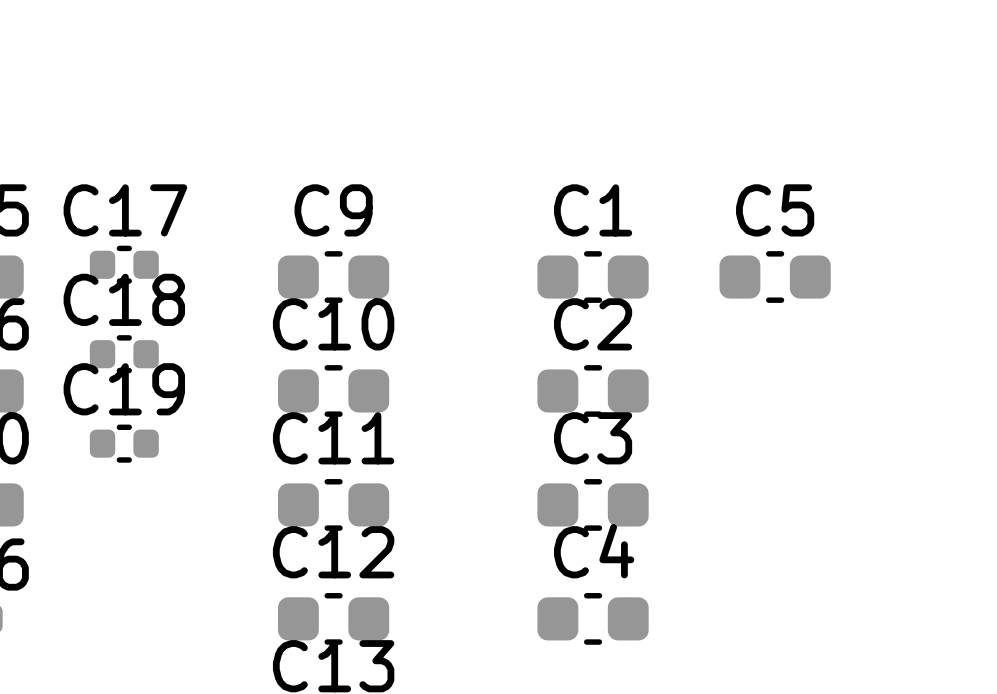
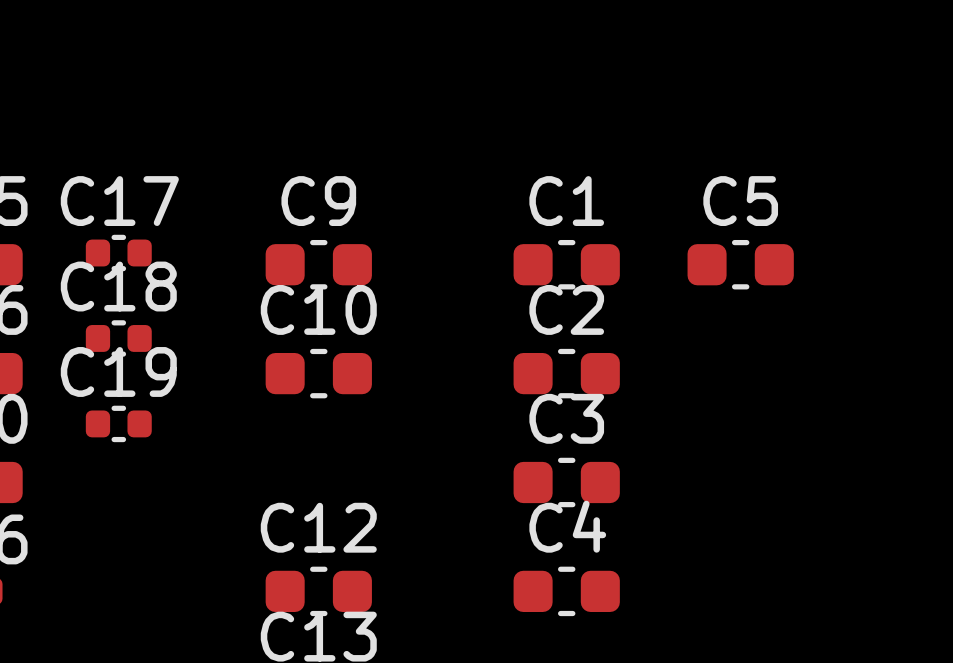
C11: (333, 504) -> none

